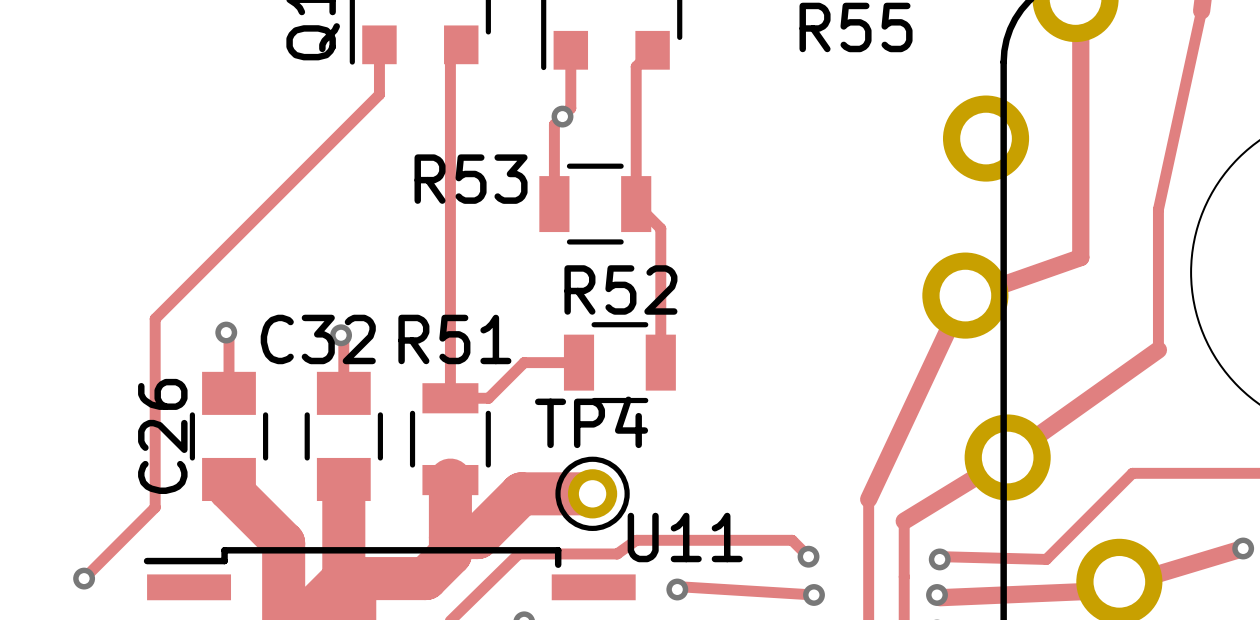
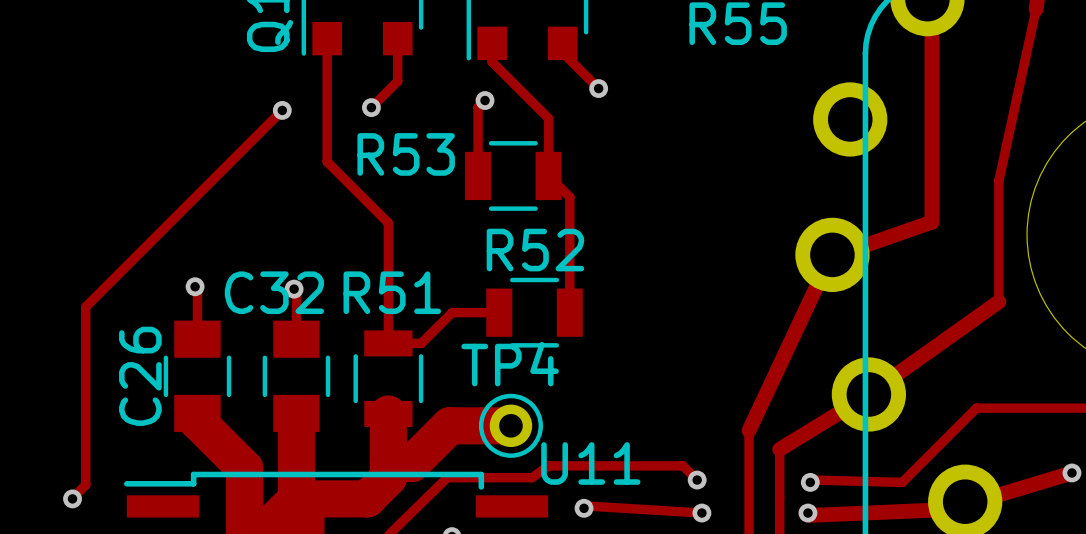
track: none -> (397, 38) (397, 81) (371, 107)
track: (652, 50) (636, 66) (636, 137) -> (562, 43) (562, 52) (598, 88)
track: (450, 55) (450, 258) -> (327, 81) (327, 161) (388, 223)
track: (570, 71) (570, 108) (562, 116) -> (492, 62) (548, 118)
track: (379, 94) (155, 318) (155, 507) (84, 578) -> none
via: none -> (598, 88)
via: none -> (371, 107)
track: none -> (282, 110) (85, 307) (85, 484) (73, 497)
via: none -> (282, 110)

